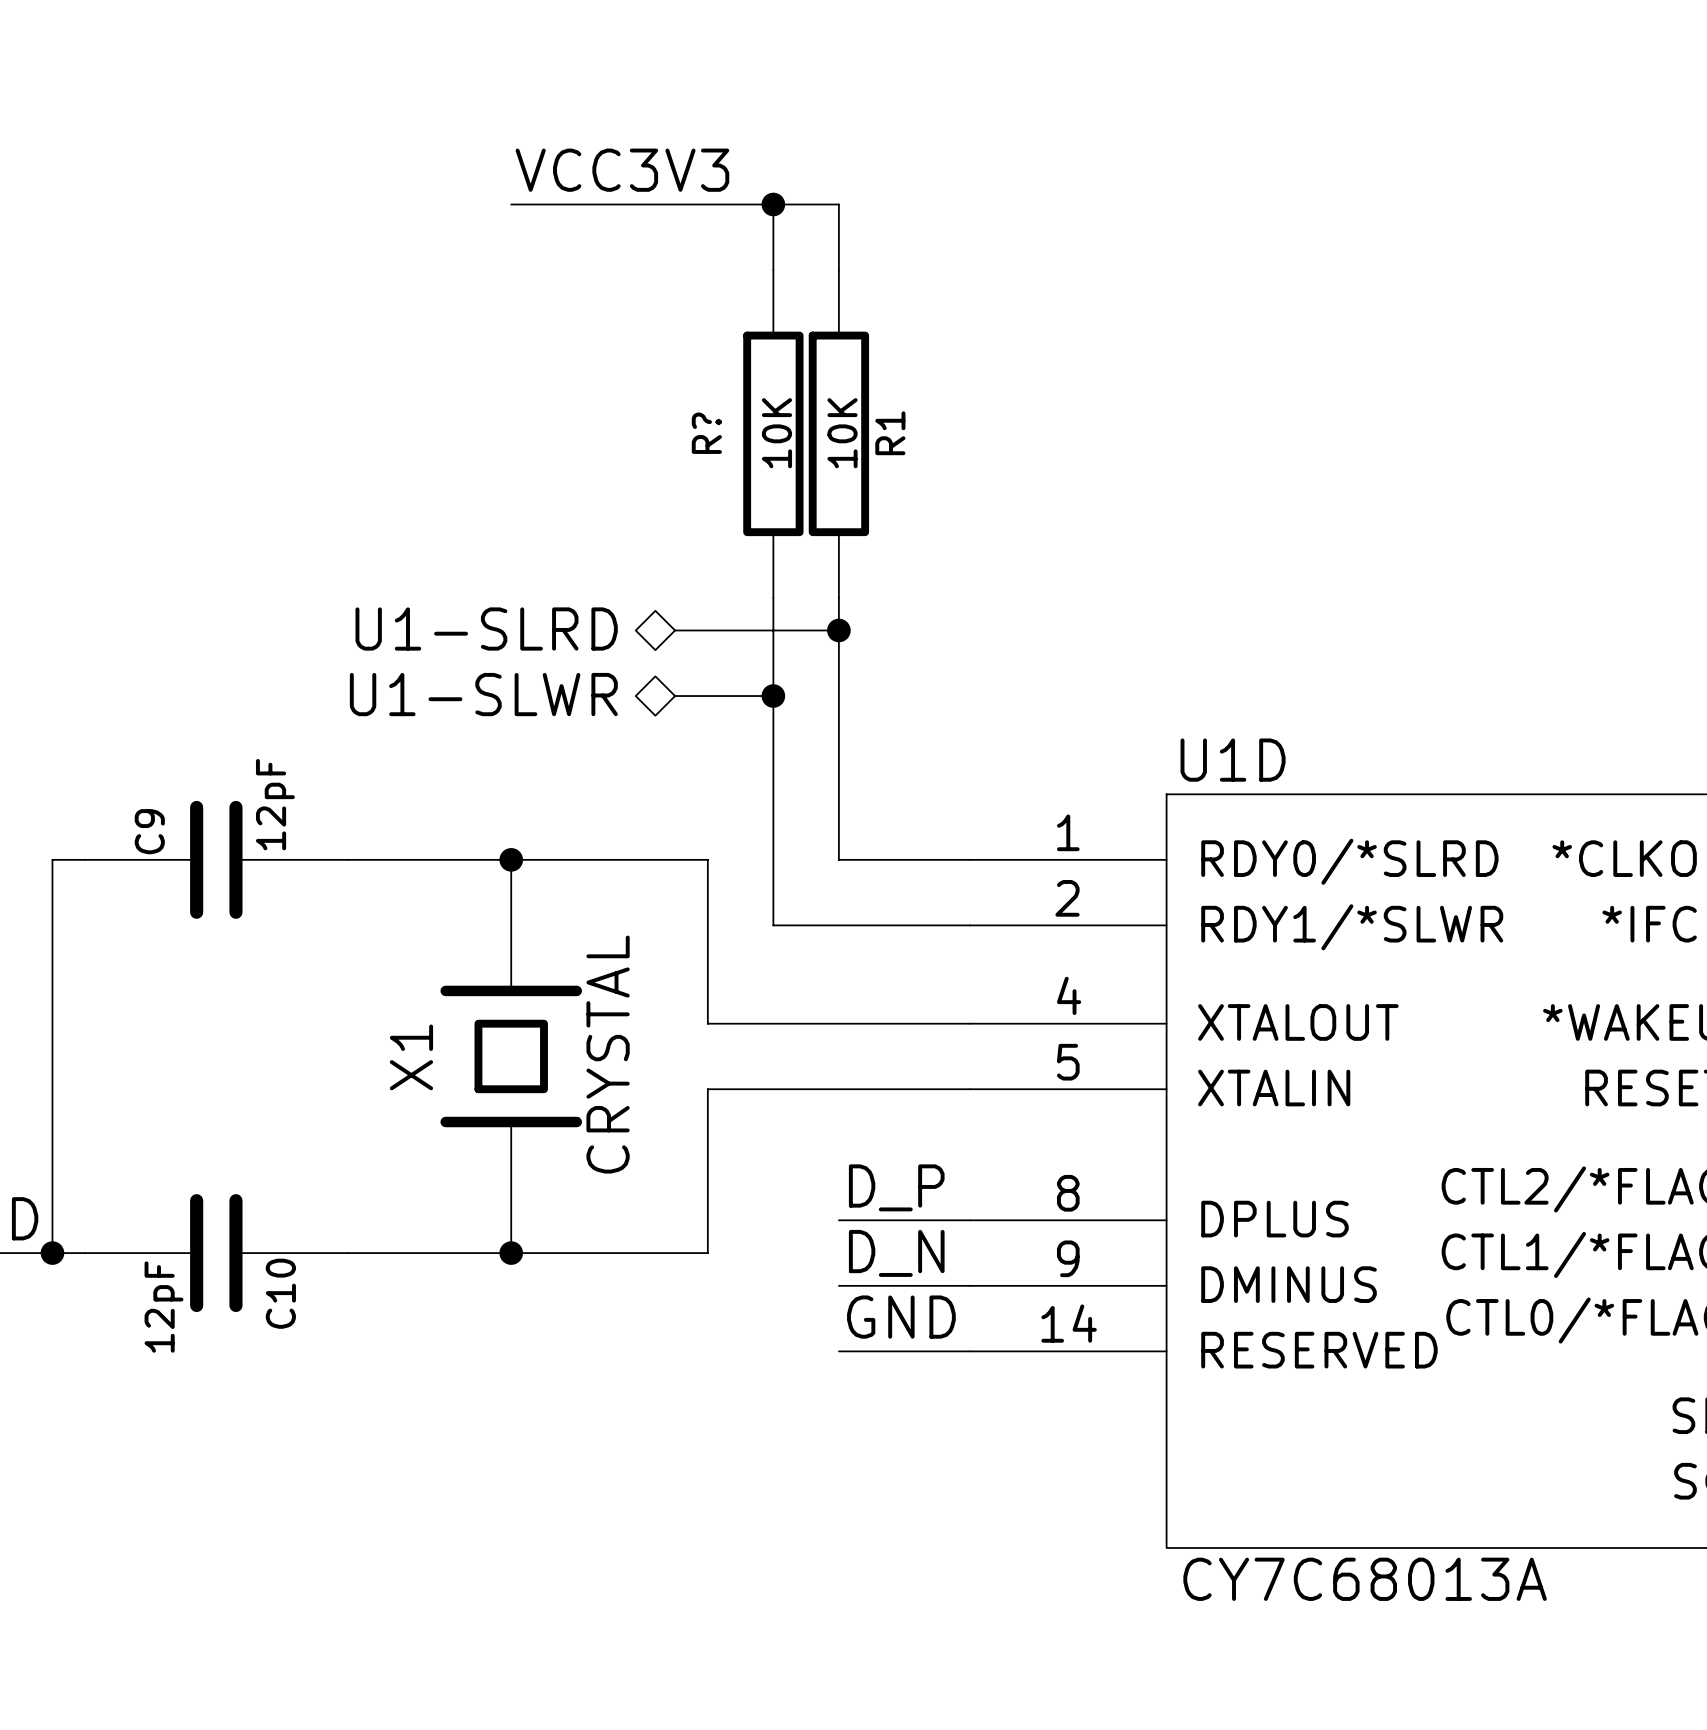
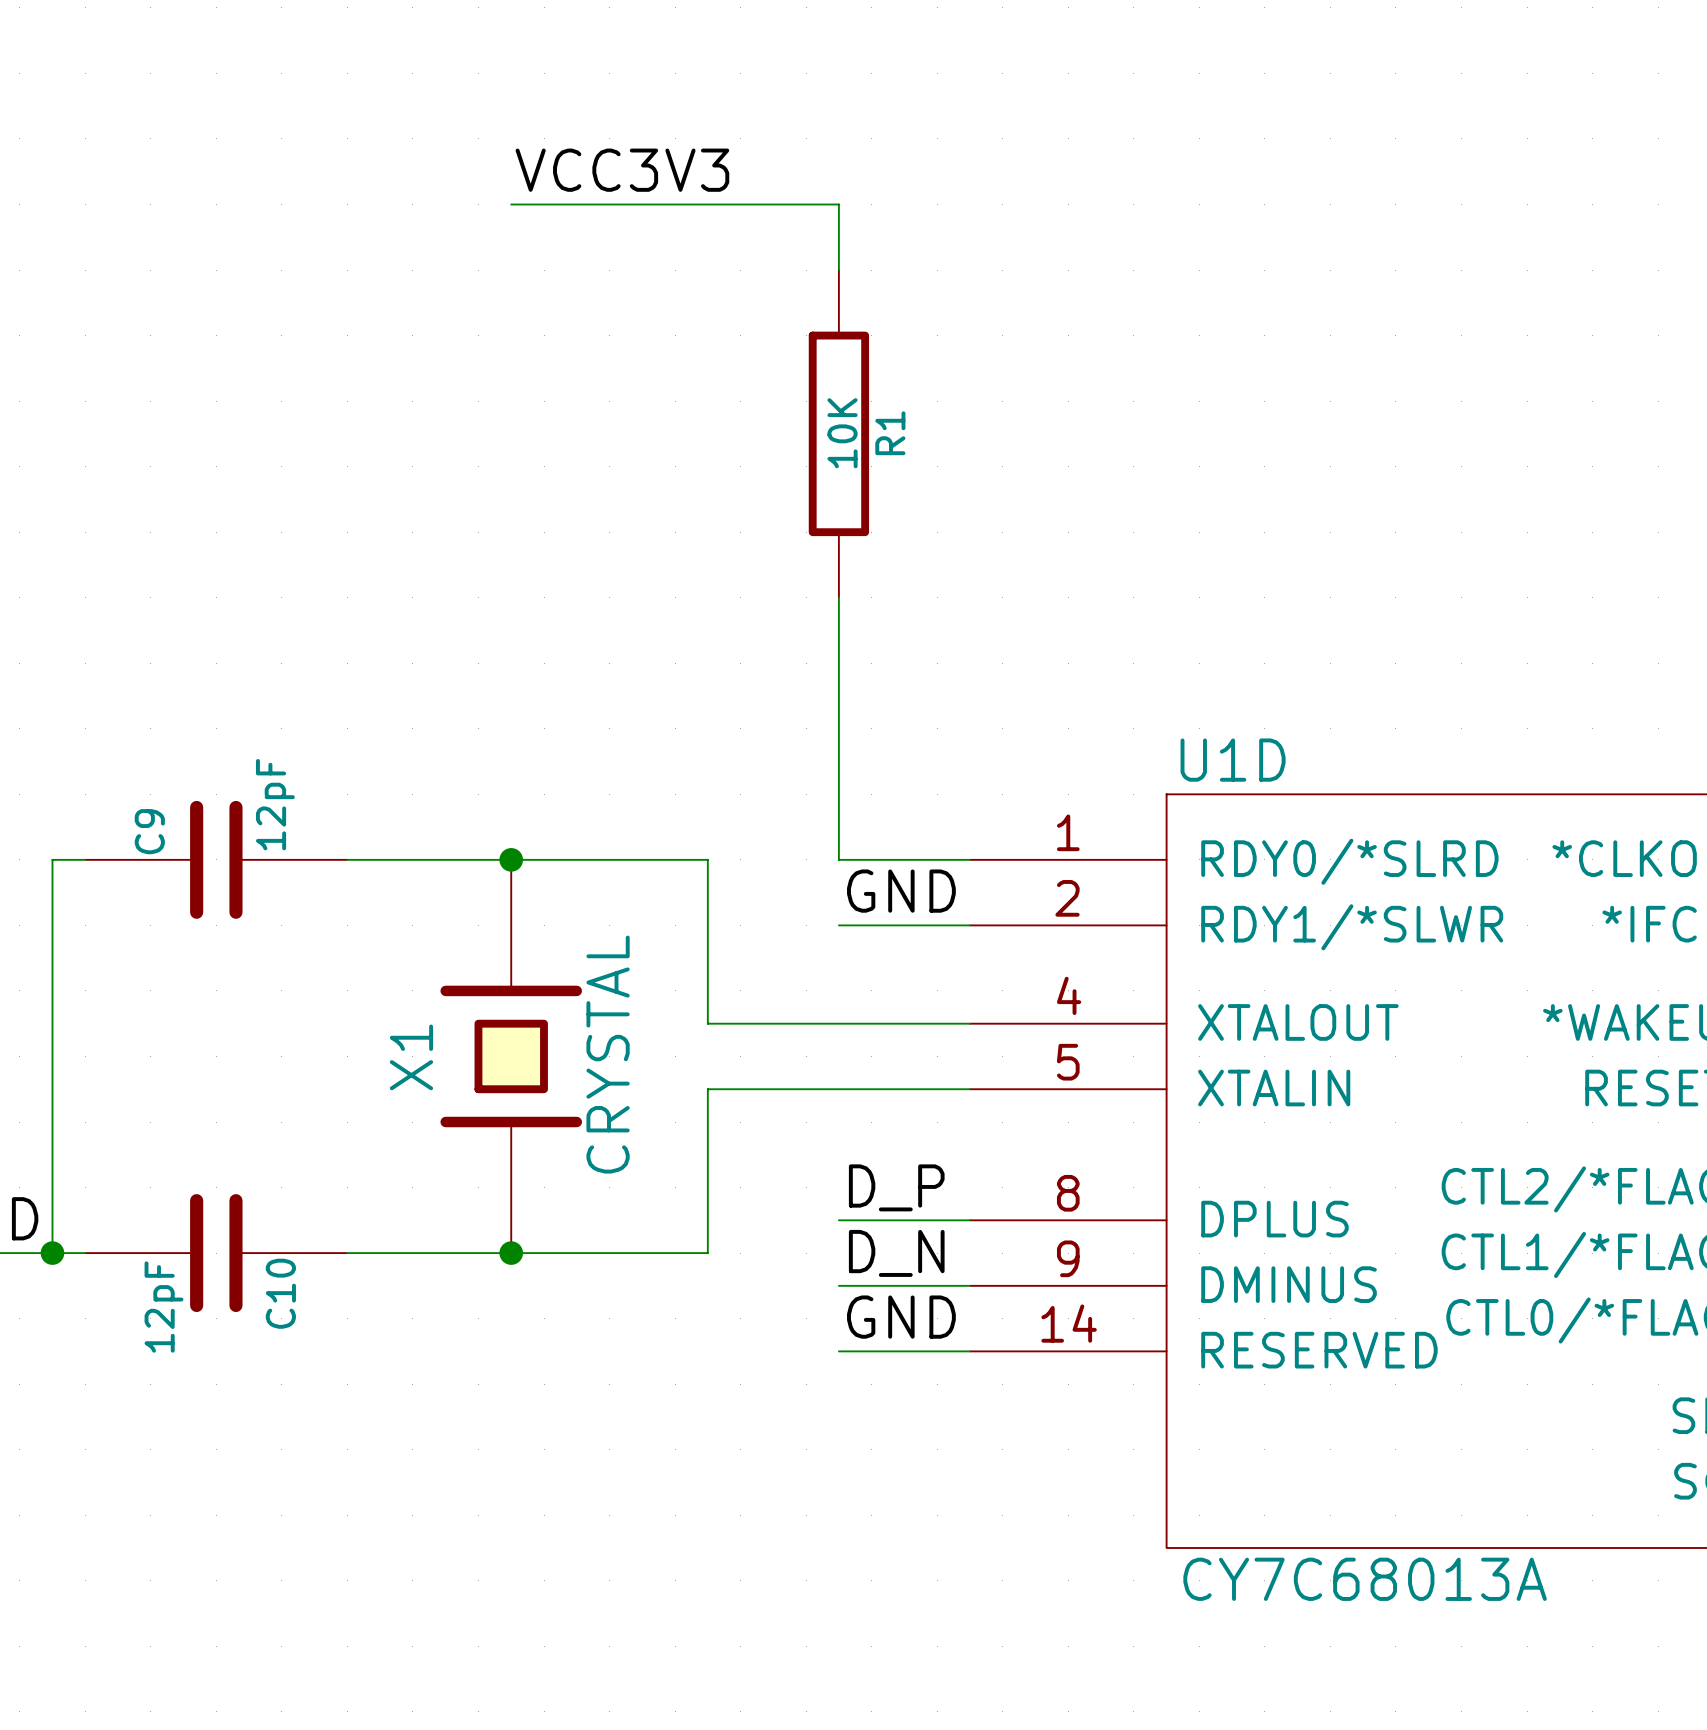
wire: (773, 204) (773, 270) -> none
junction: (773, 204) -> none
R?: 10K (773, 433) -> none
wire: (773, 597) (773, 925) (838, 925) -> none
hierarchical label: U1-SLRD (486, 629) -> none
wire: (675, 630) (838, 630) -> none
junction: (838, 630) -> none
hierarchical label: U1-SLWR (483, 694) -> none
wire: (675, 696) (773, 696) -> none
junction: (773, 696) -> none
label: none -> GND (901, 891)

